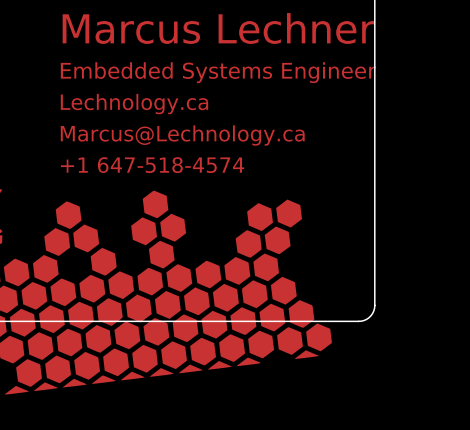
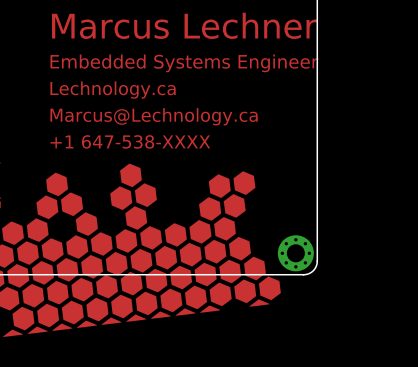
text: +1 647-518-4574 (152, 165) -> +1 647-538-XXXX (130, 141)
part: none -> (295, 253)

